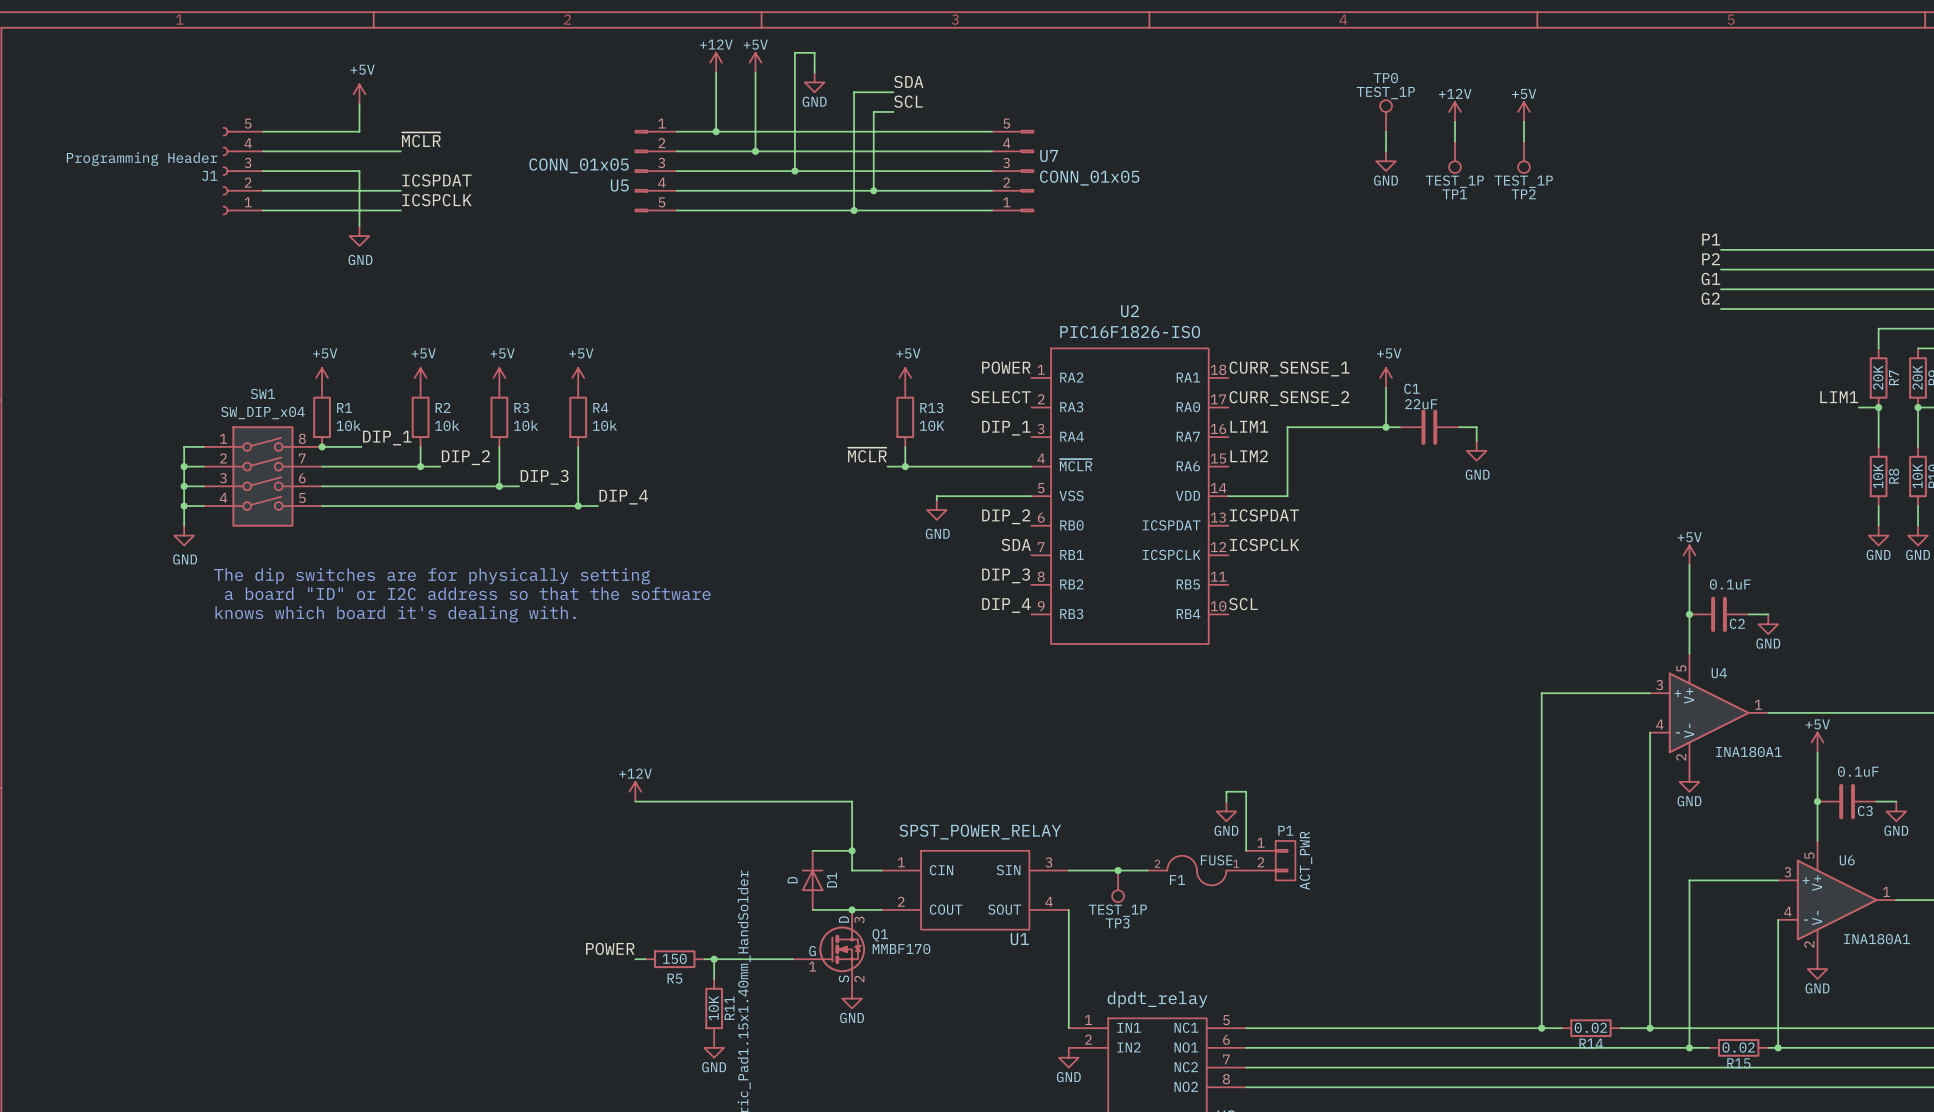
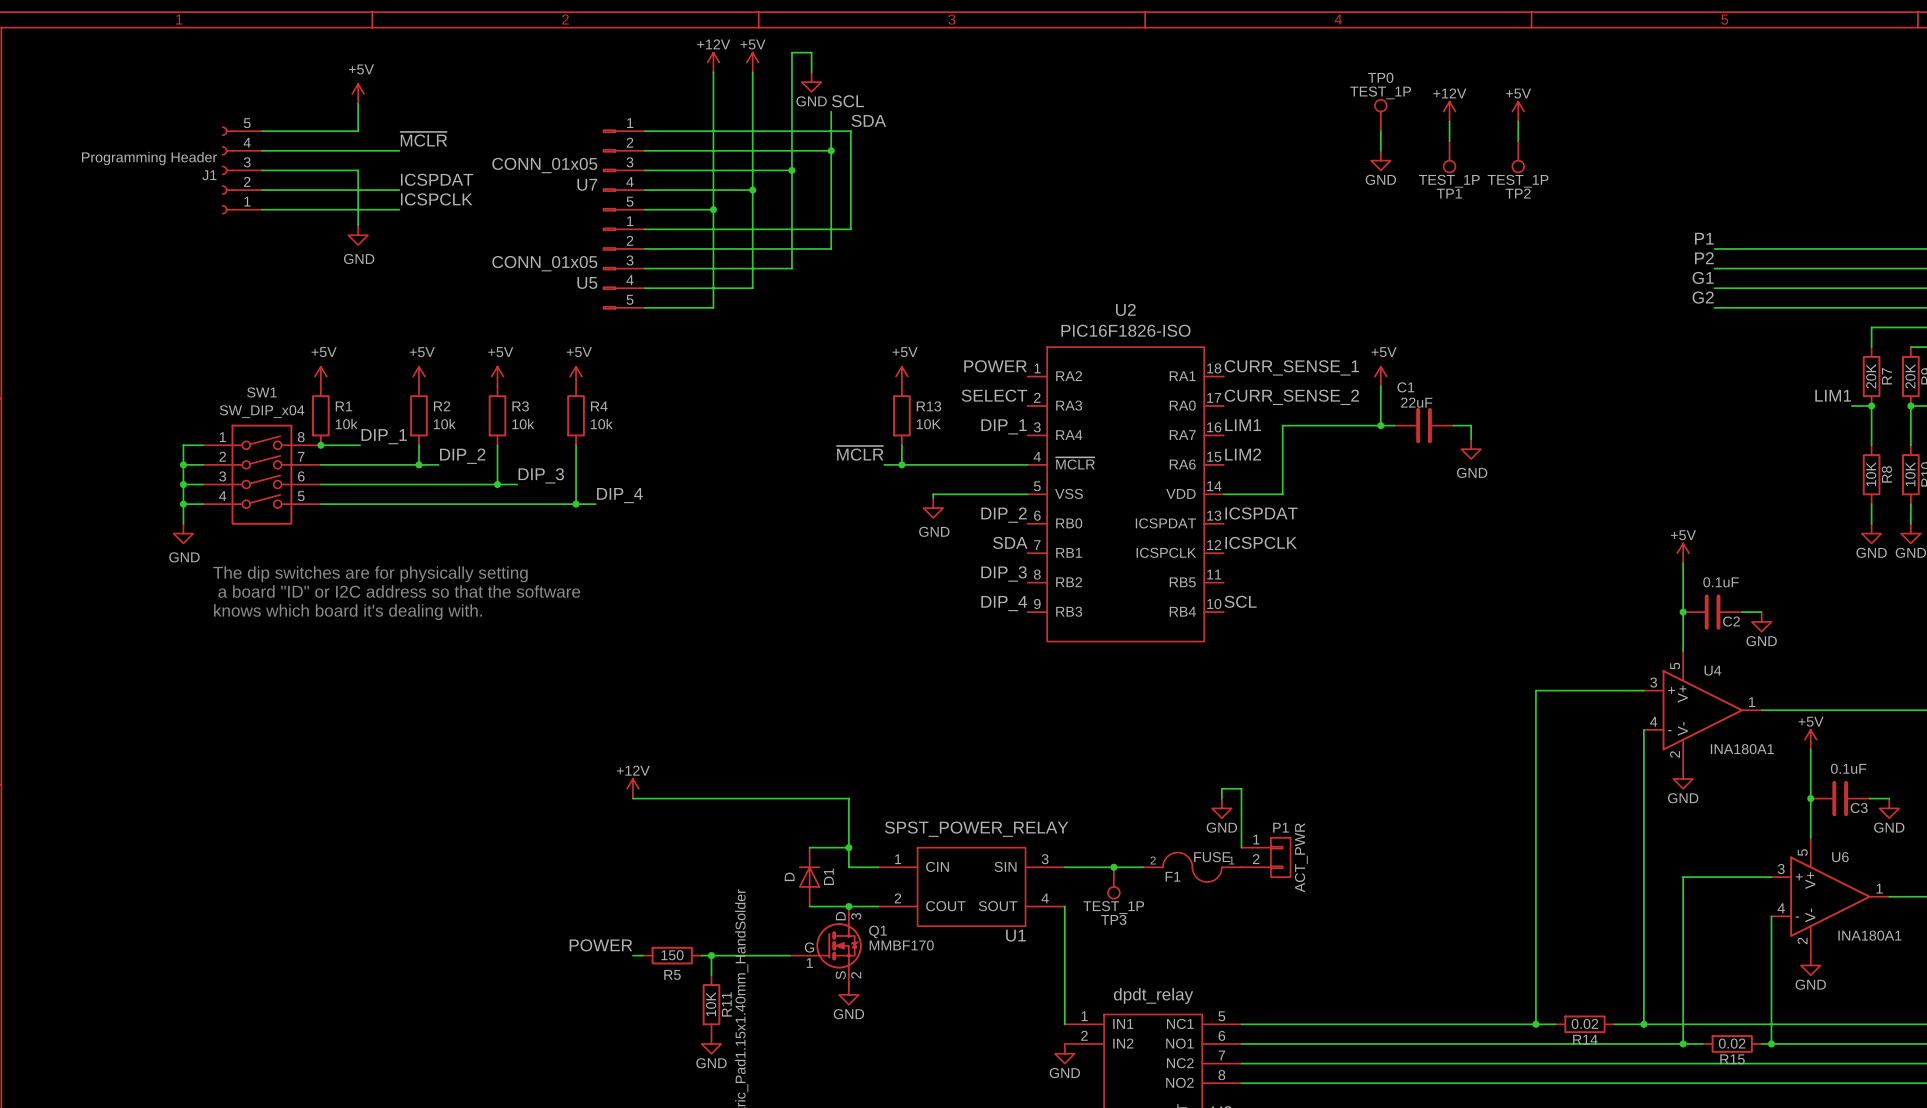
label position: SDA (908, 81) -> SDA (868, 120)
wire: (893, 92) (854, 92) (854, 131) (991, 131) -> none
label position: SCL (908, 101) -> SCL (847, 101)
wire: none -> (831, 111) (831, 248) (644, 248)
wire: (893, 111) (873, 111) (873, 190) -> none
wire: none -> (713, 131) (713, 307) (644, 307)
junction: (716, 131) -> none
wire: none -> (752, 150) (752, 288) (644, 288)
junction: (755, 151) -> none
wire: (834, 151) (991, 151) -> none
junction: none -> (831, 150)
U5 position: (656, 171) -> (624, 268)
wire: (794, 171) (991, 171) -> (791, 170) (791, 268) (644, 268)
U7 position: (1012, 171) -> (624, 170)
U7 rotation: 0° (1027, 171) -> 180° (609, 170)
wire: (755, 190) (991, 190) -> none
junction: none -> (752, 190)
junction: (873, 190) -> none
wire: (716, 210) (991, 210) -> none
junction: none -> (713, 209)
wire: none -> (850, 209) (850, 229) (644, 229)
junction: (854, 210) -> none

